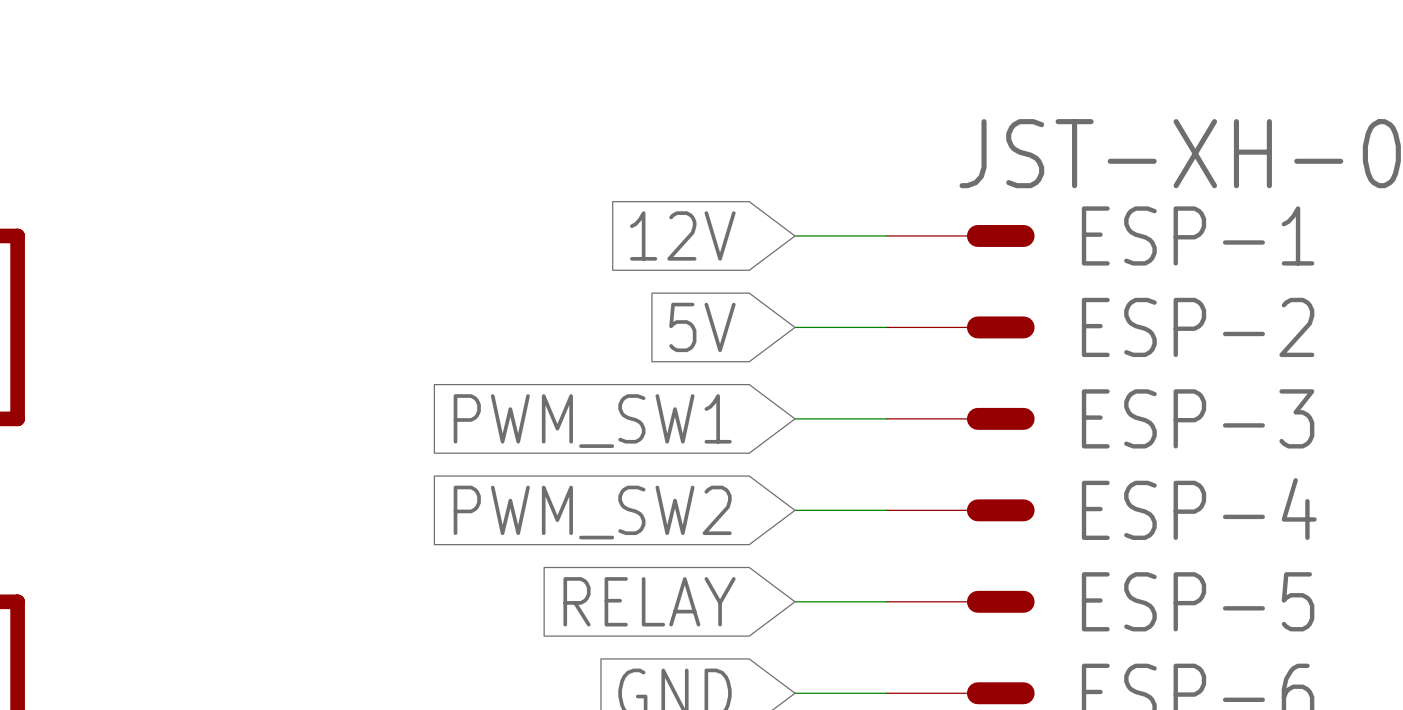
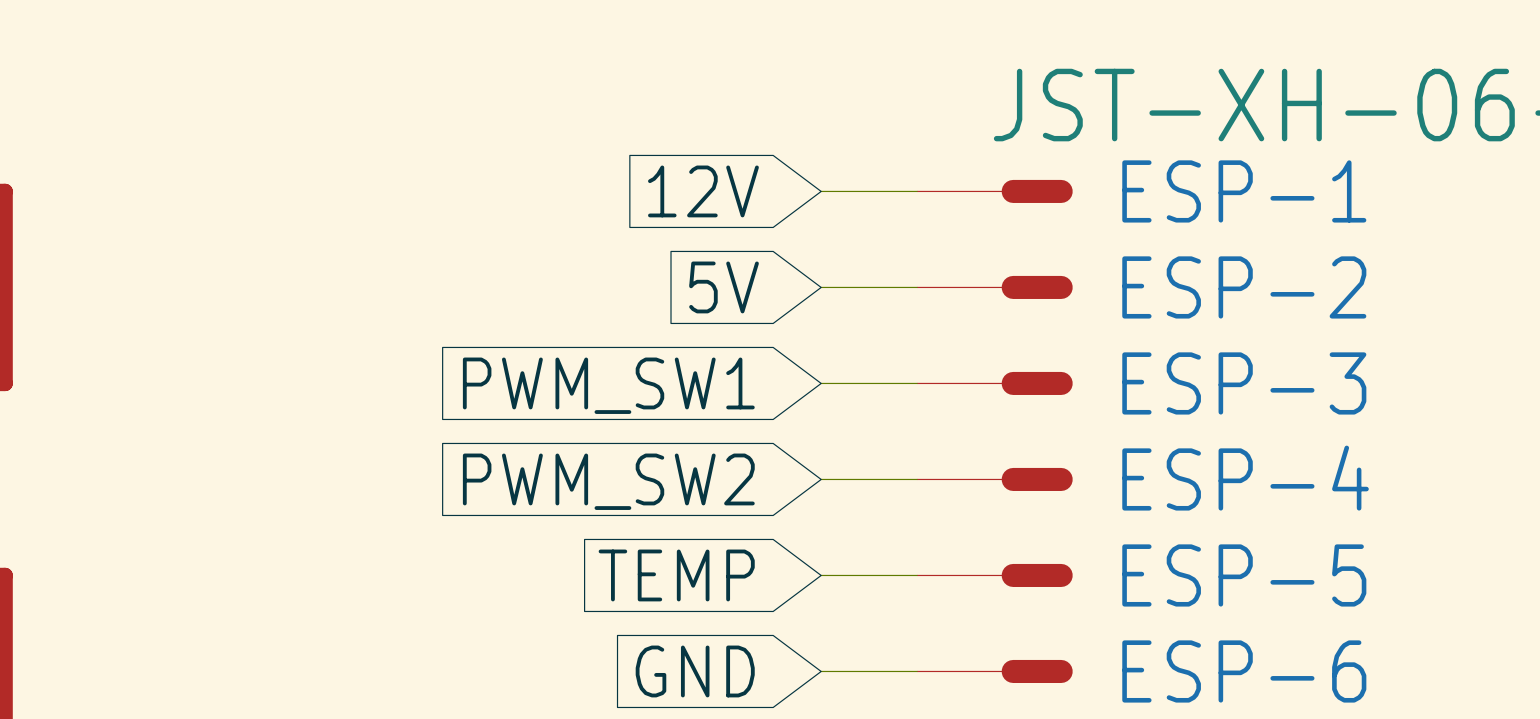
global label: RELAY (649, 601) -> TEMP (676, 575)

